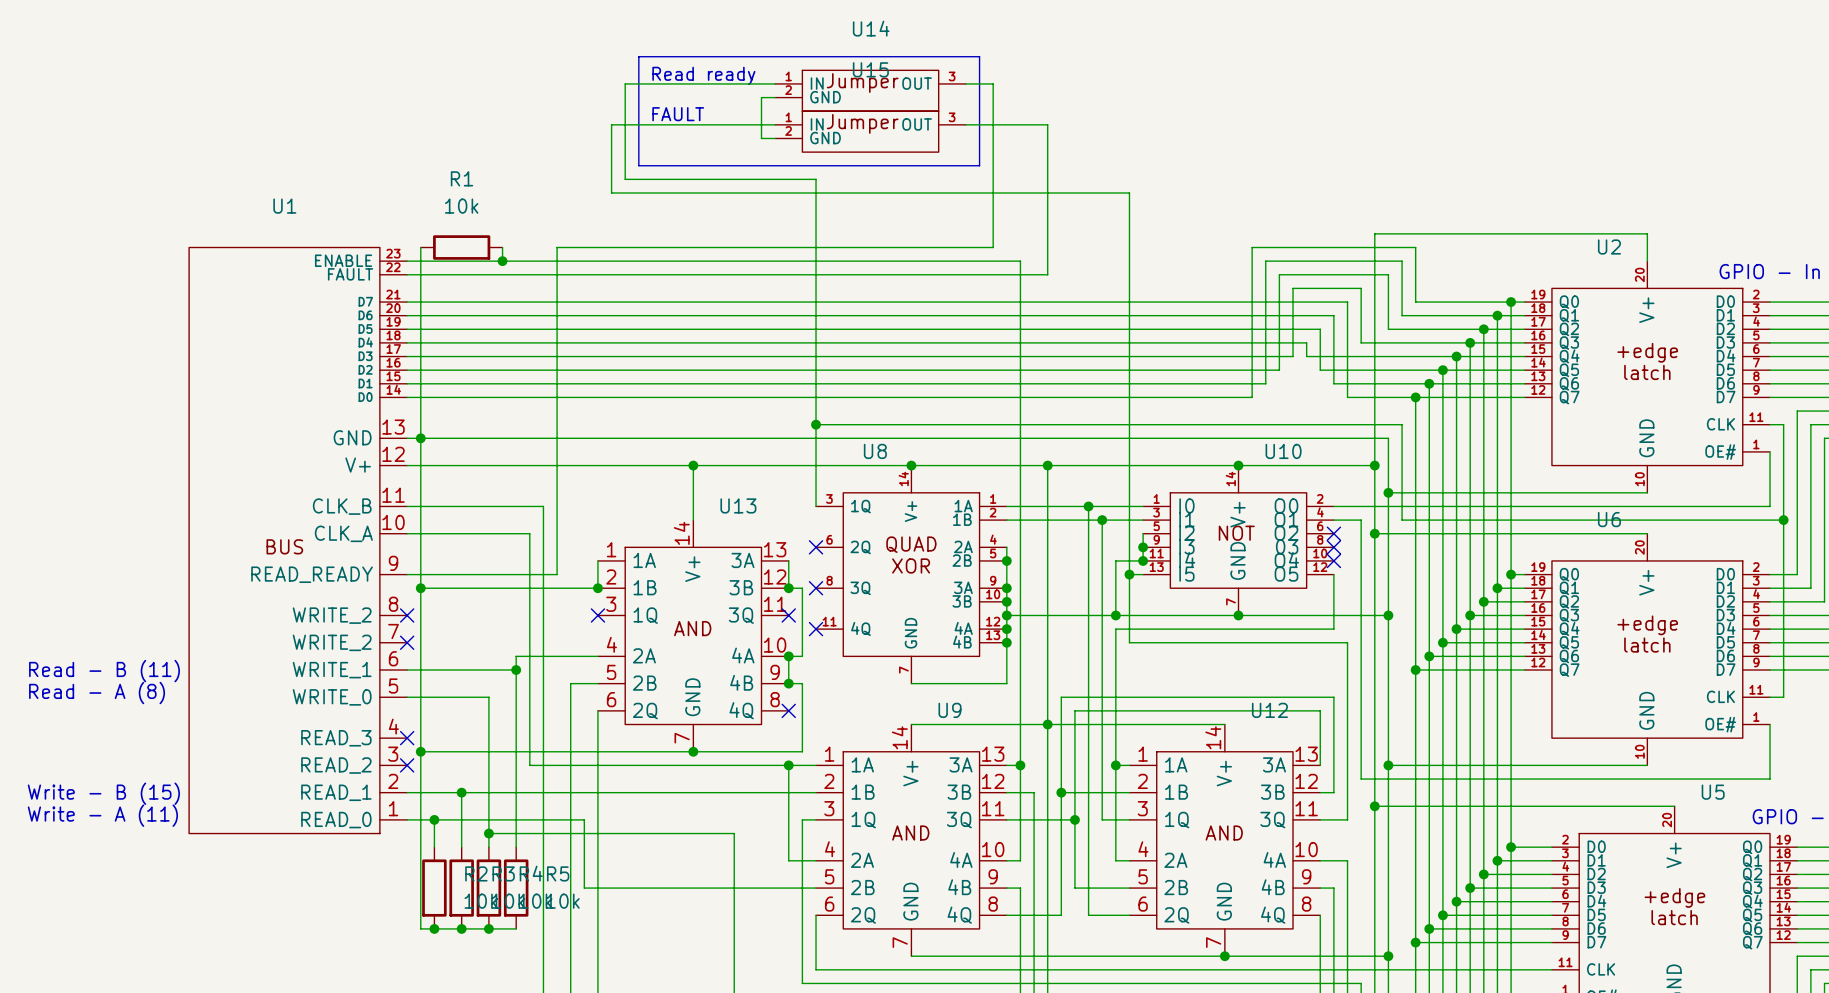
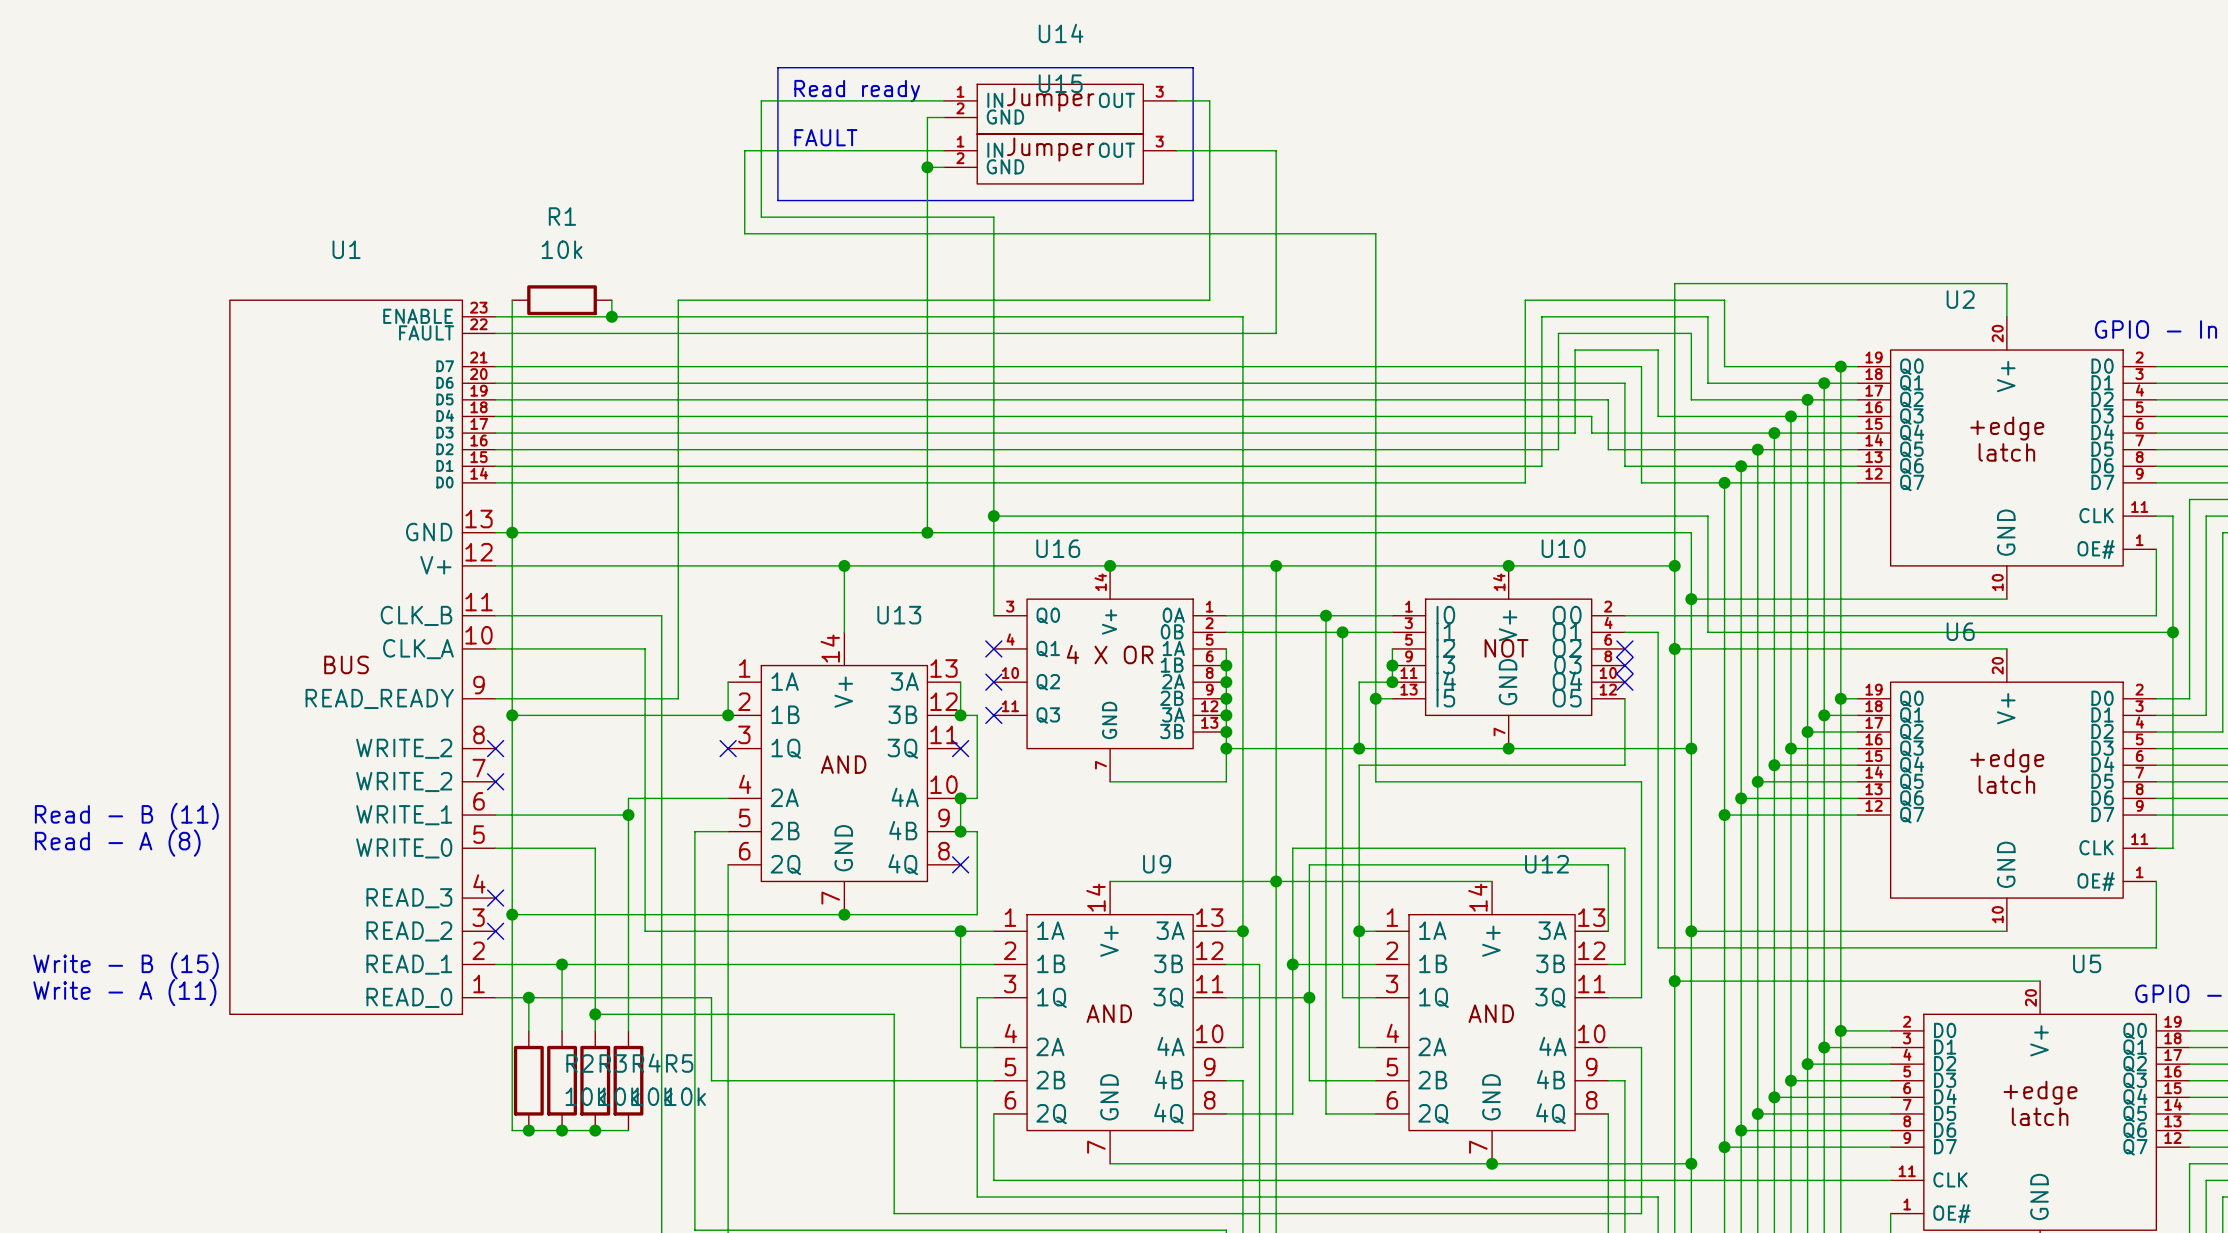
wire: none -> (927, 167) (927, 532)
junction: none -> (927, 167)
junction: none -> (927, 532)
no-connect mark: none -> (993, 648)
wire: none -> (1226, 648) (1226, 665)
no-connect mark: (816, 547) -> none
junction: none -> (1226, 665)
U16: none -> (1110, 673)
no-connect mark: none -> (993, 682)
U8: (911, 574) -> none
junction: none -> (1226, 698)
no-connect mark: (816, 629) -> none
junction: (1006, 629) -> none
wire: (1006, 642) (1006, 683) (911, 683) -> (1226, 781) (1110, 781)
junction: (1006, 642) -> none

